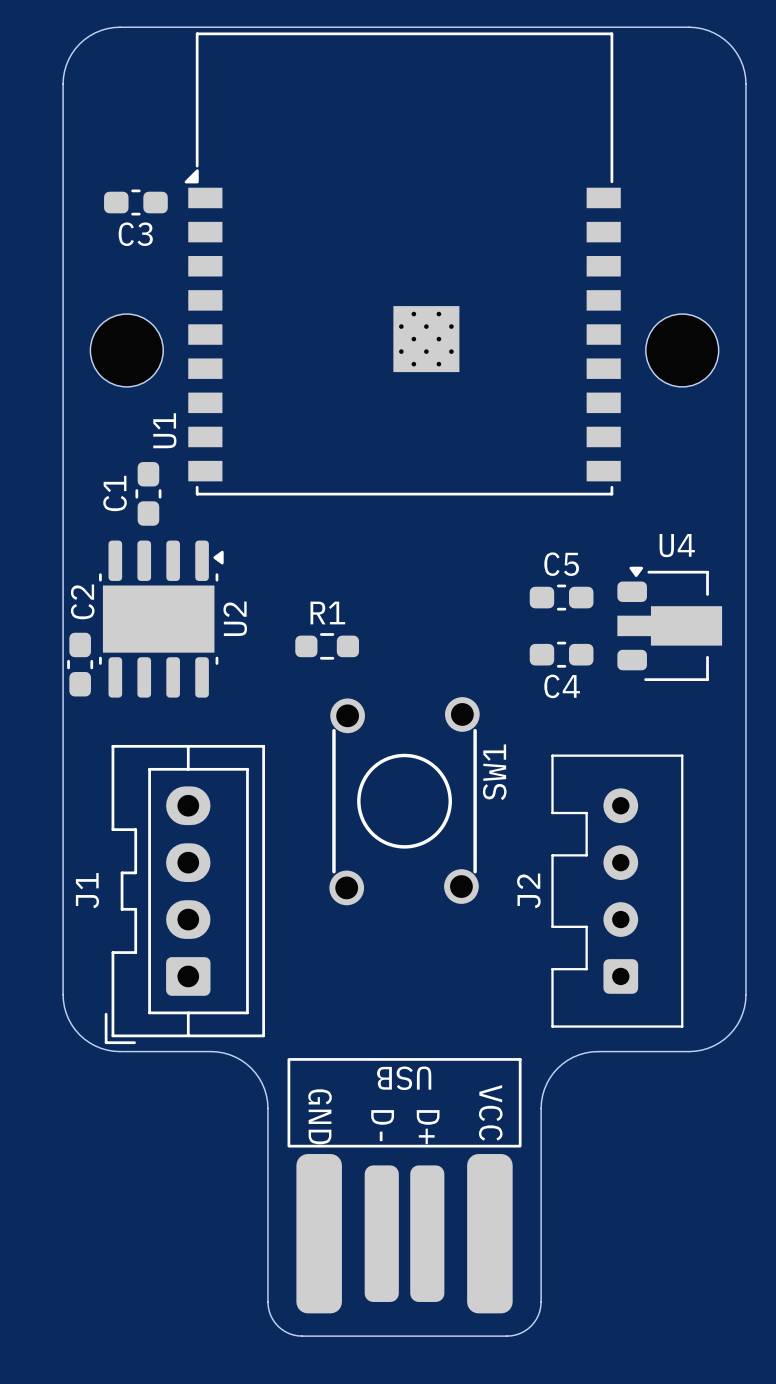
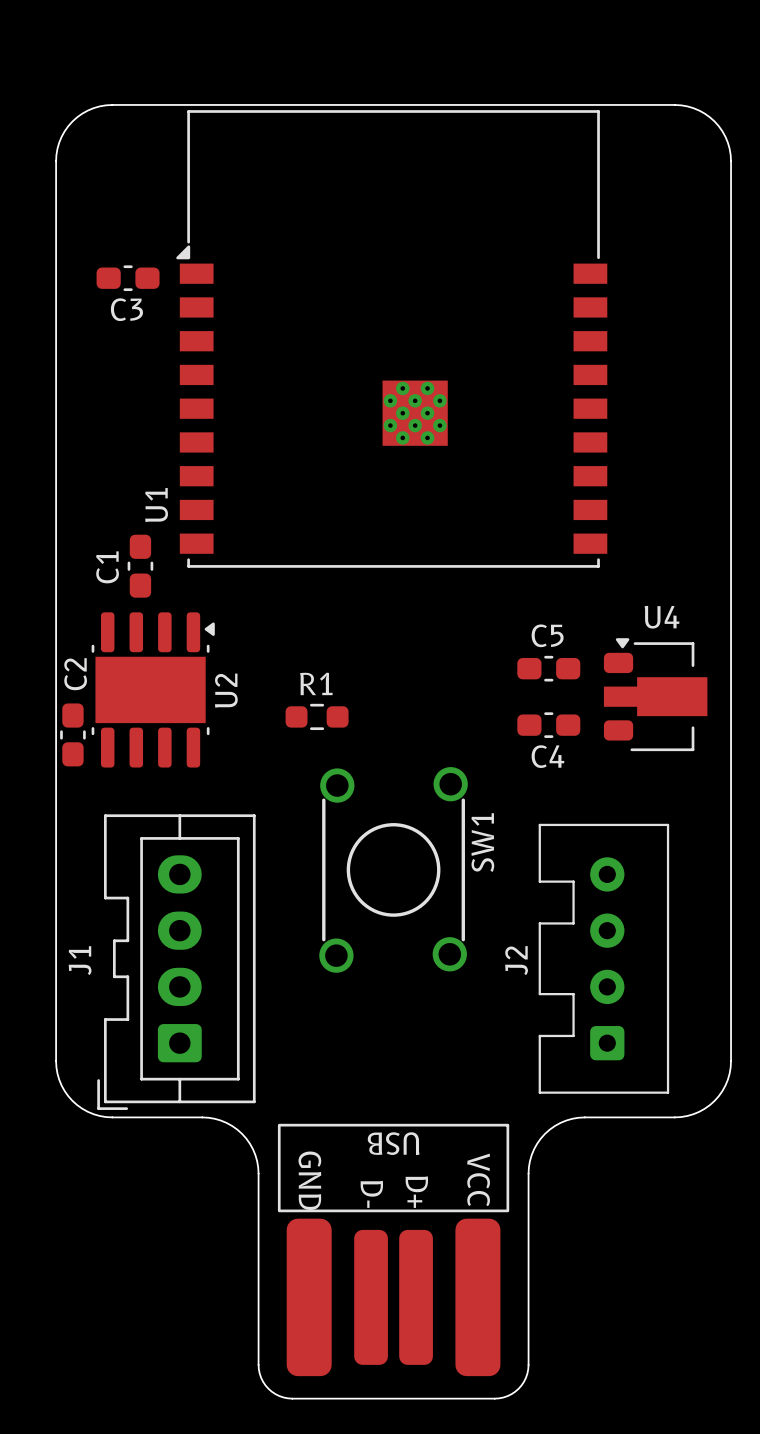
part: (126, 350) -> none
part: (682, 350) -> none

